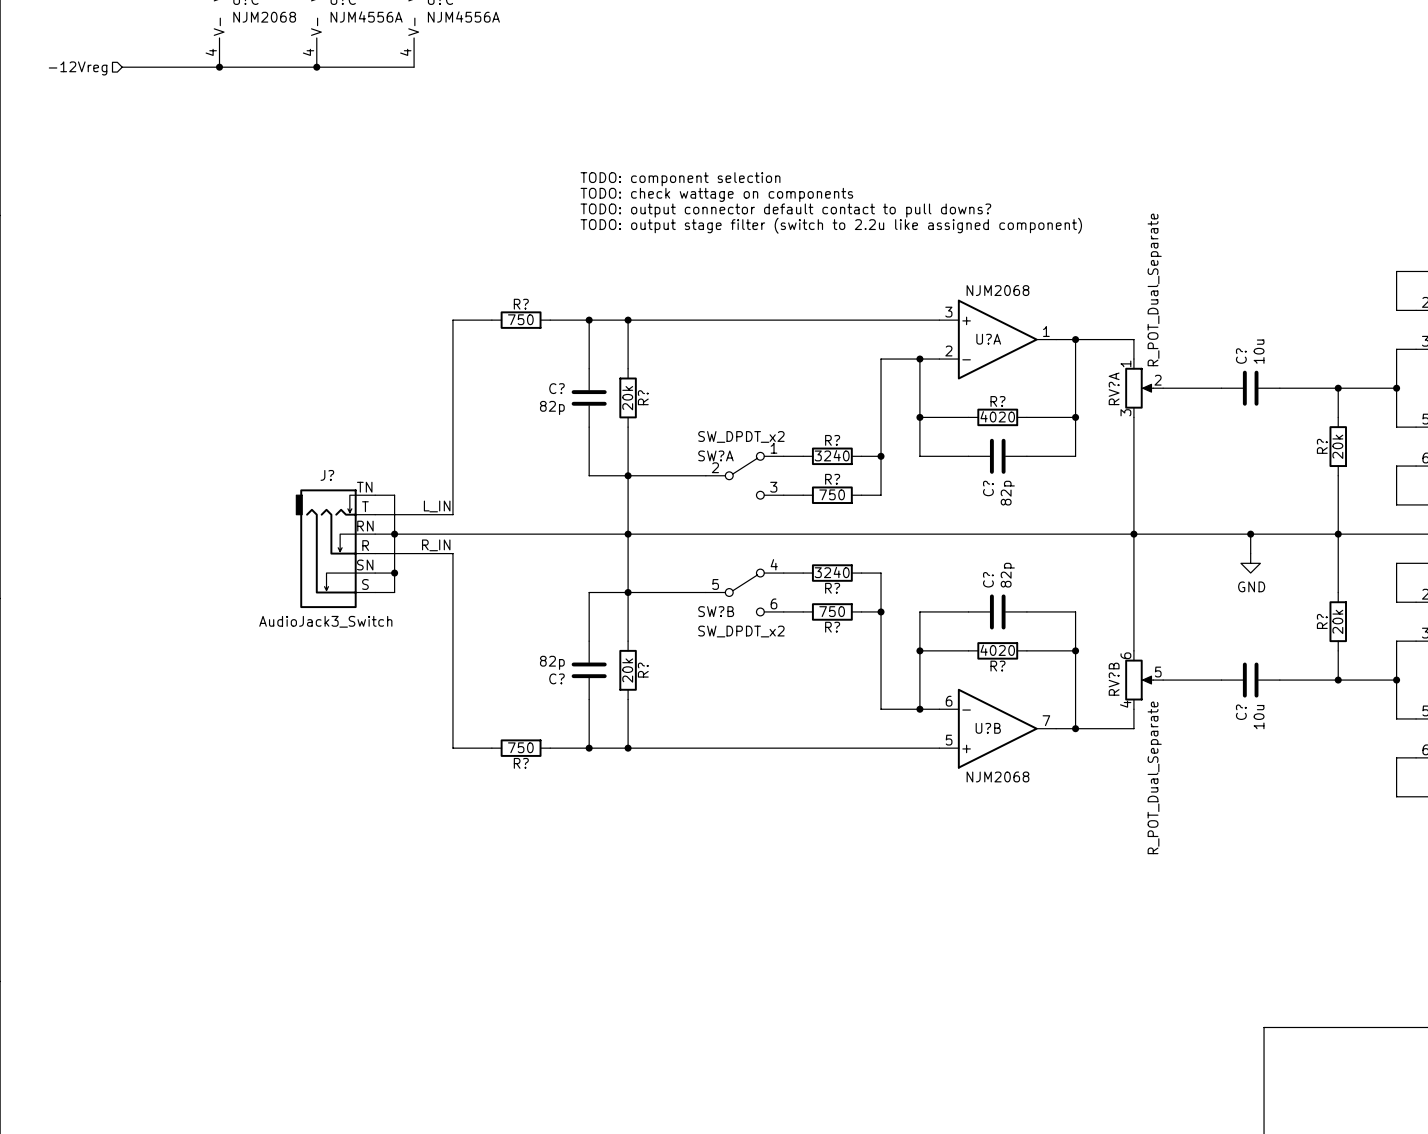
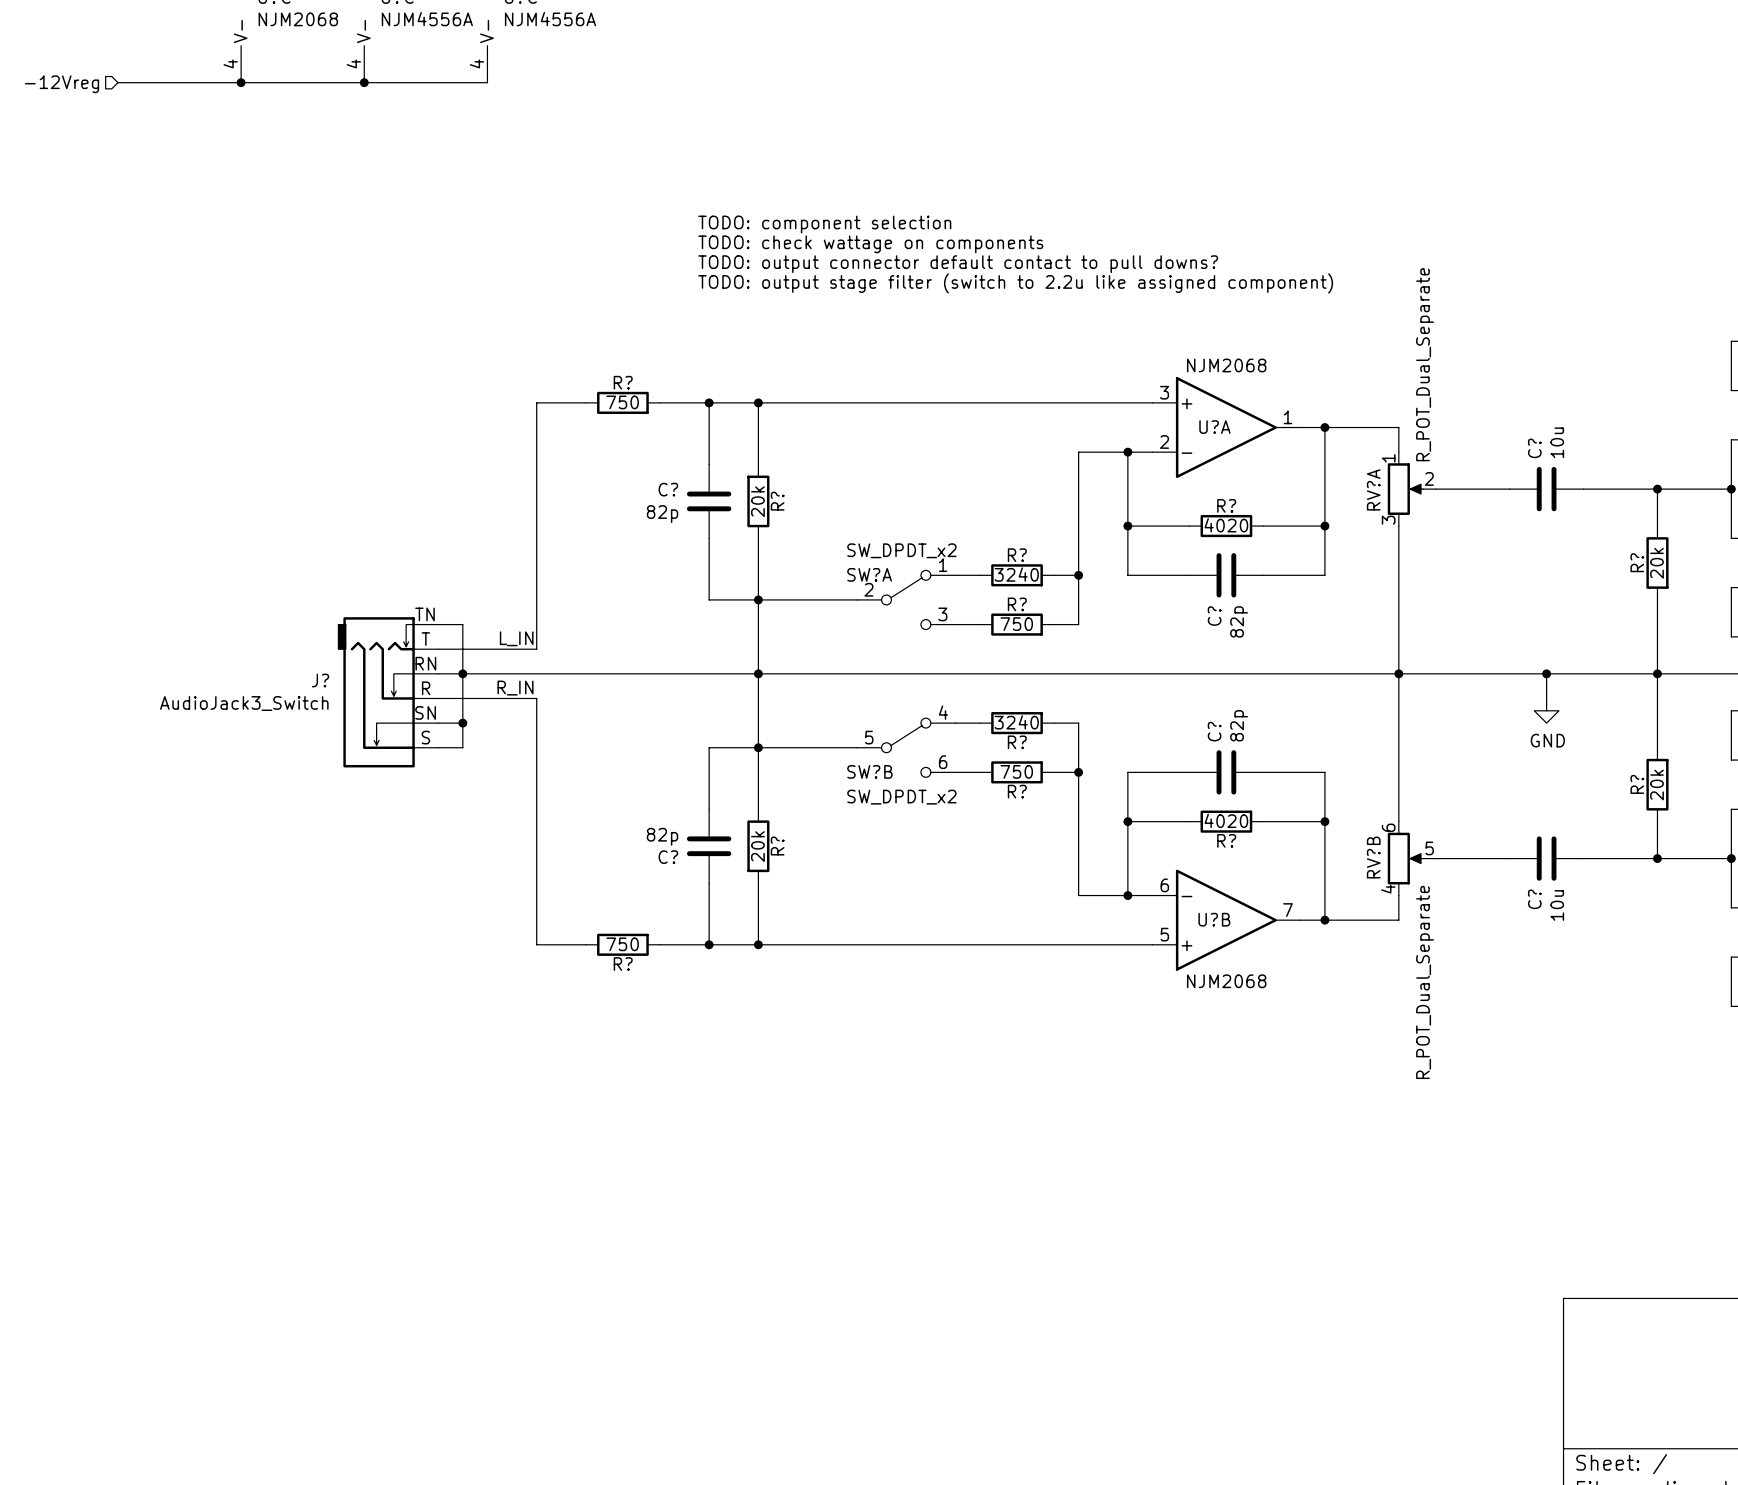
J? name position: J? (327, 475) -> J? (320, 680)
J? value position: AudioJack3_Switch (325, 621) -> AudioJack3_Switch (244, 703)

